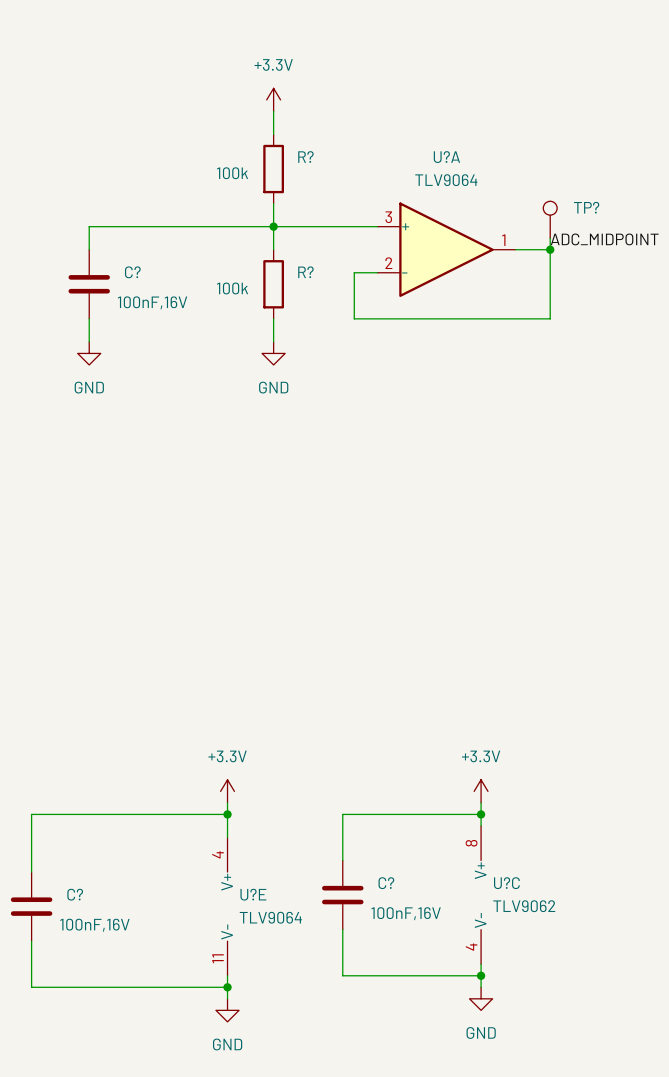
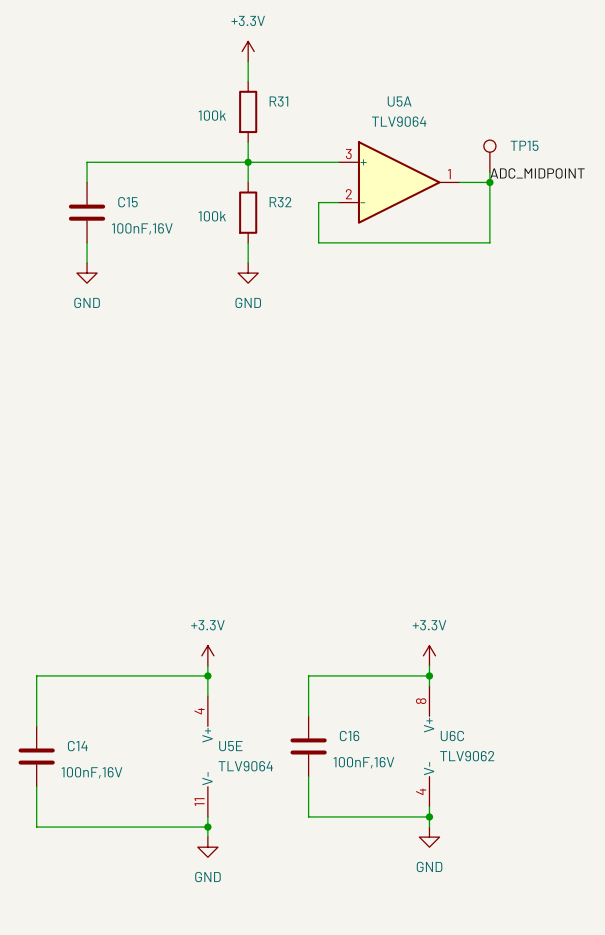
R? name: R? (305, 157) -> R31 (278, 101)
U?A name: U?A (446, 157) -> U5A (399, 101)
TP? name: TP? (586, 207) -> TP15 (524, 145)
C? name: C? (132, 272) -> C15 (127, 202)
R? name: R? (305, 272) -> R32 (280, 202)
C? name: C? (386, 883) -> C16 (349, 736)
U?C name: U?C (506, 883) -> U6C (452, 736)
C? name: C? (75, 894) -> C14 (77, 746)
U?E name: U?E (253, 894) -> U5E (230, 746)

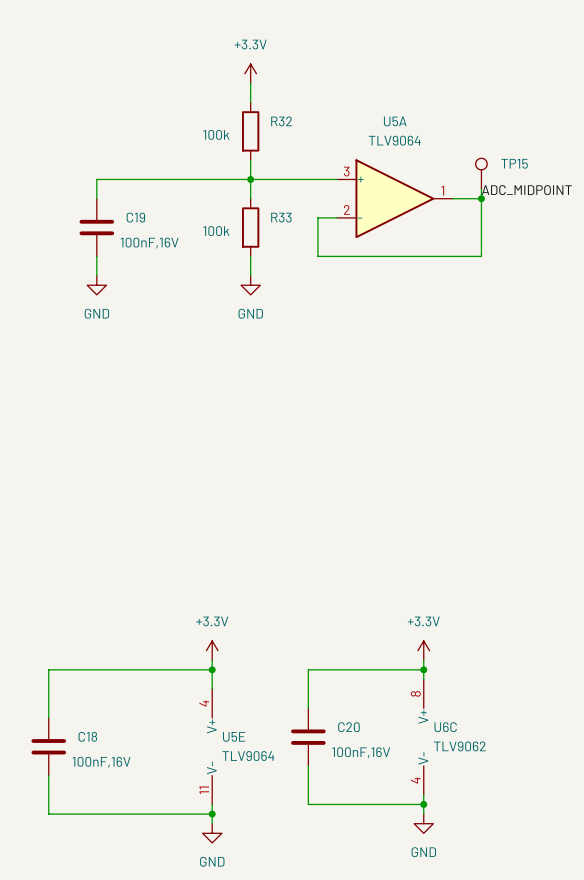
R31 name: R31 (278, 101) -> R32 (281, 121)
C15 name: C15 (127, 202) -> C19 (135, 217)
R32 name: R32 (280, 202) -> R33 (281, 217)
C16 name: C16 (349, 736) -> C20 (348, 727)
C14 name: C14 (77, 746) -> C18 (87, 736)

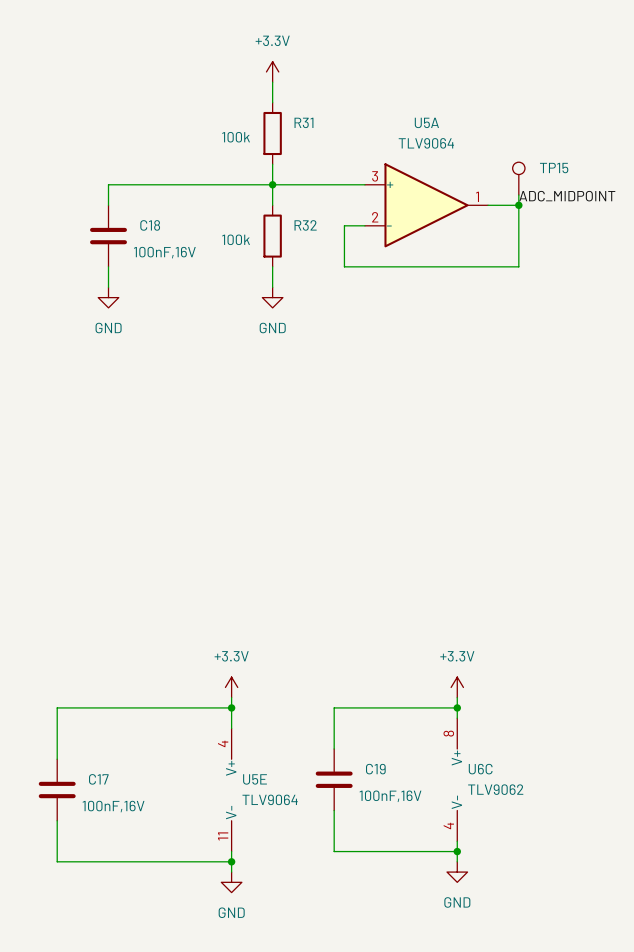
R32 name: R32 (281, 121) -> R31 (303, 122)
C19 name: C19 (135, 217) -> C18 (150, 225)
R33 name: R33 (281, 217) -> R32 (305, 225)
C20 name: C20 (348, 727) -> C19 (375, 769)
C18 name: C18 (87, 736) -> C17 (98, 779)

